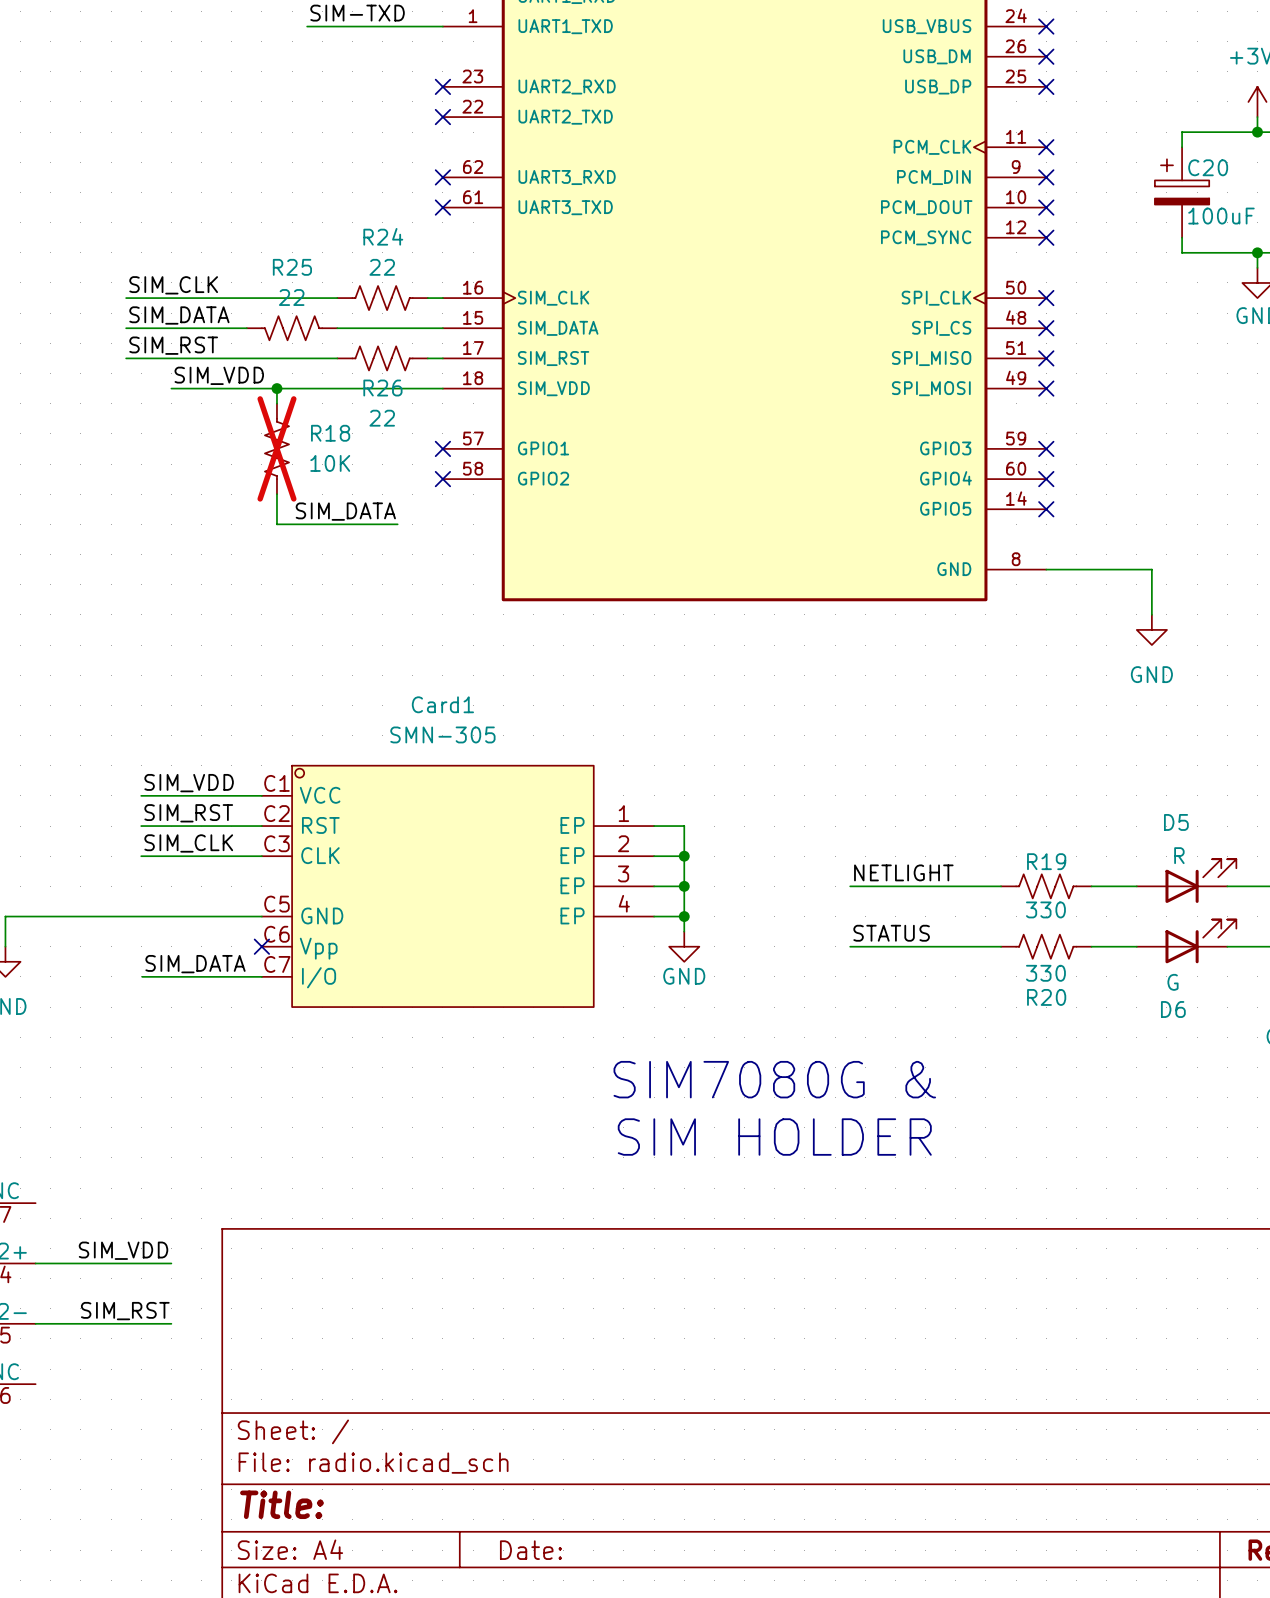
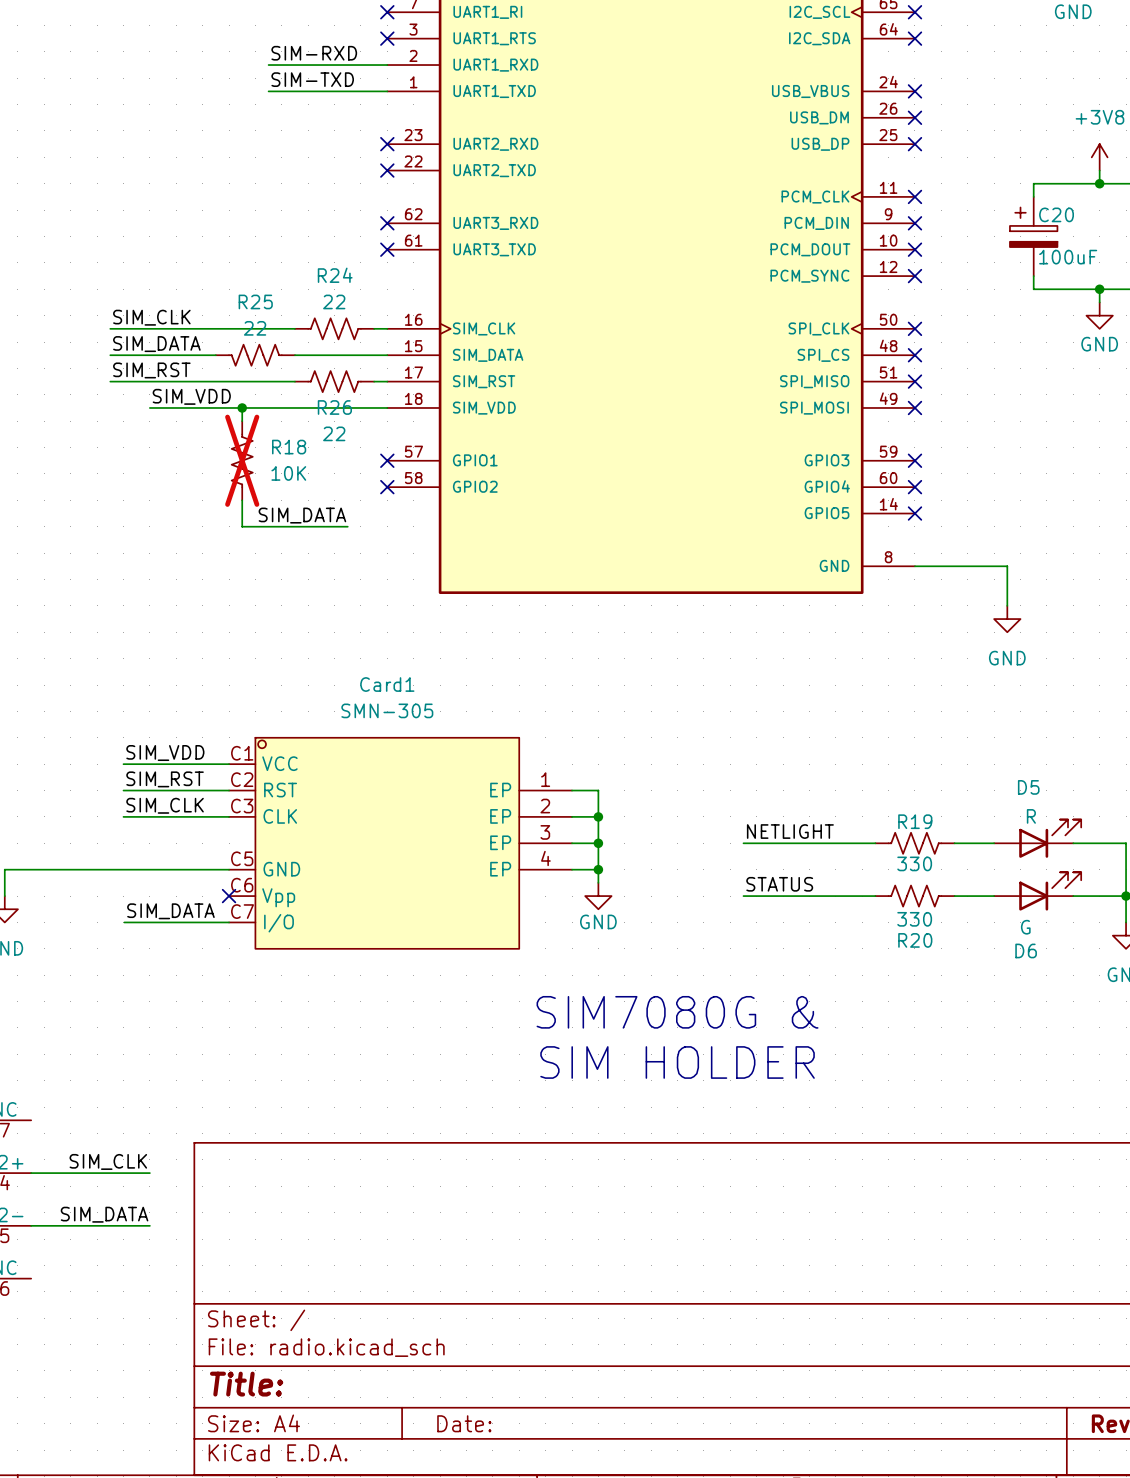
label: SIM_VDD (123, 1250) -> SIM_CLK (108, 1161)
label: SIM_RST (125, 1311) -> SIM_DATA (104, 1214)

